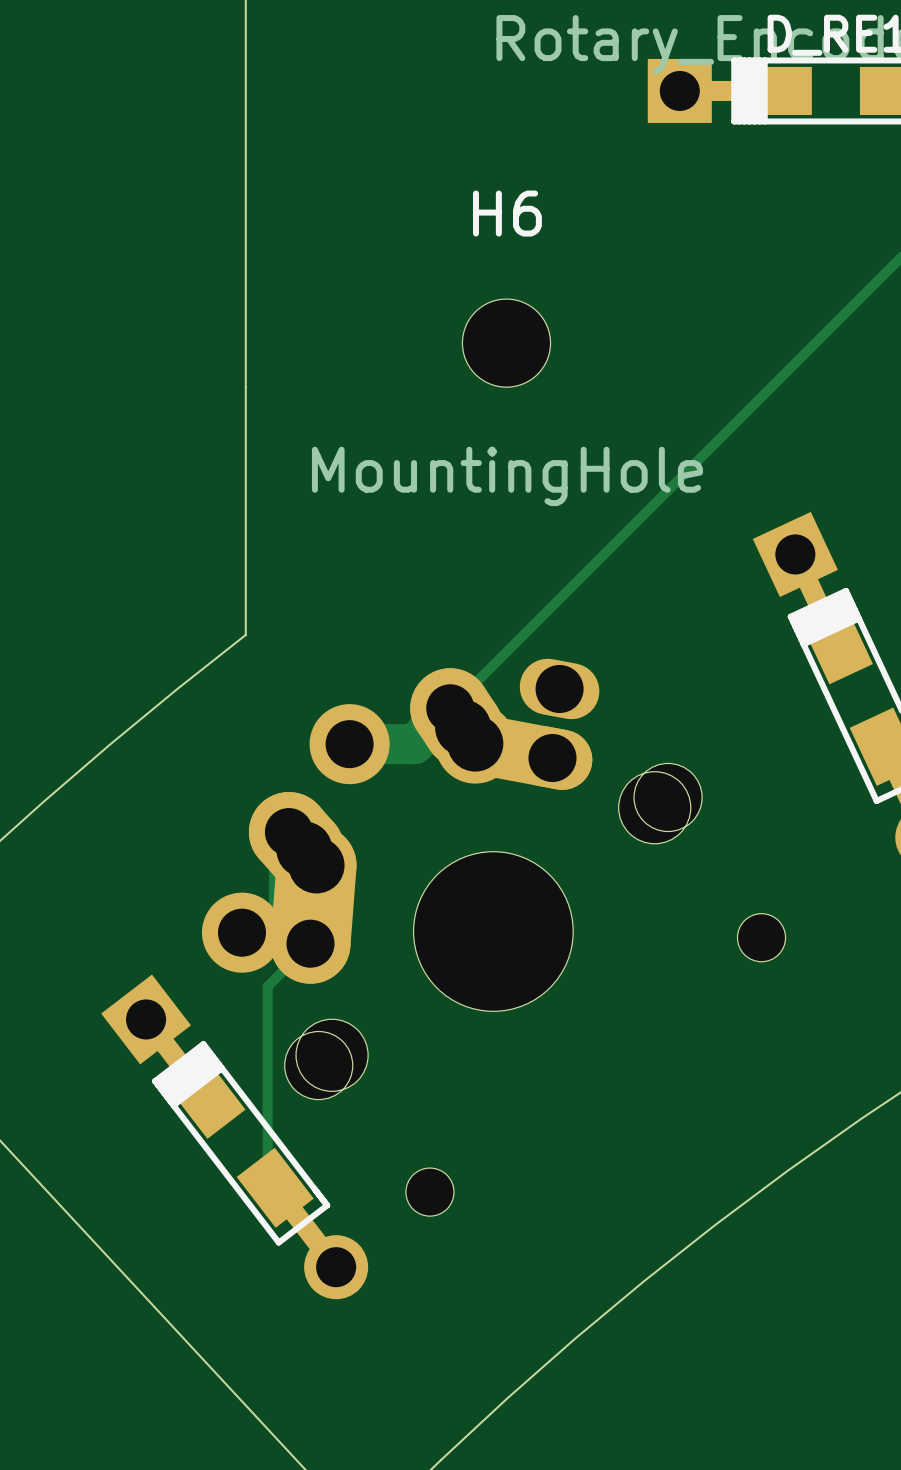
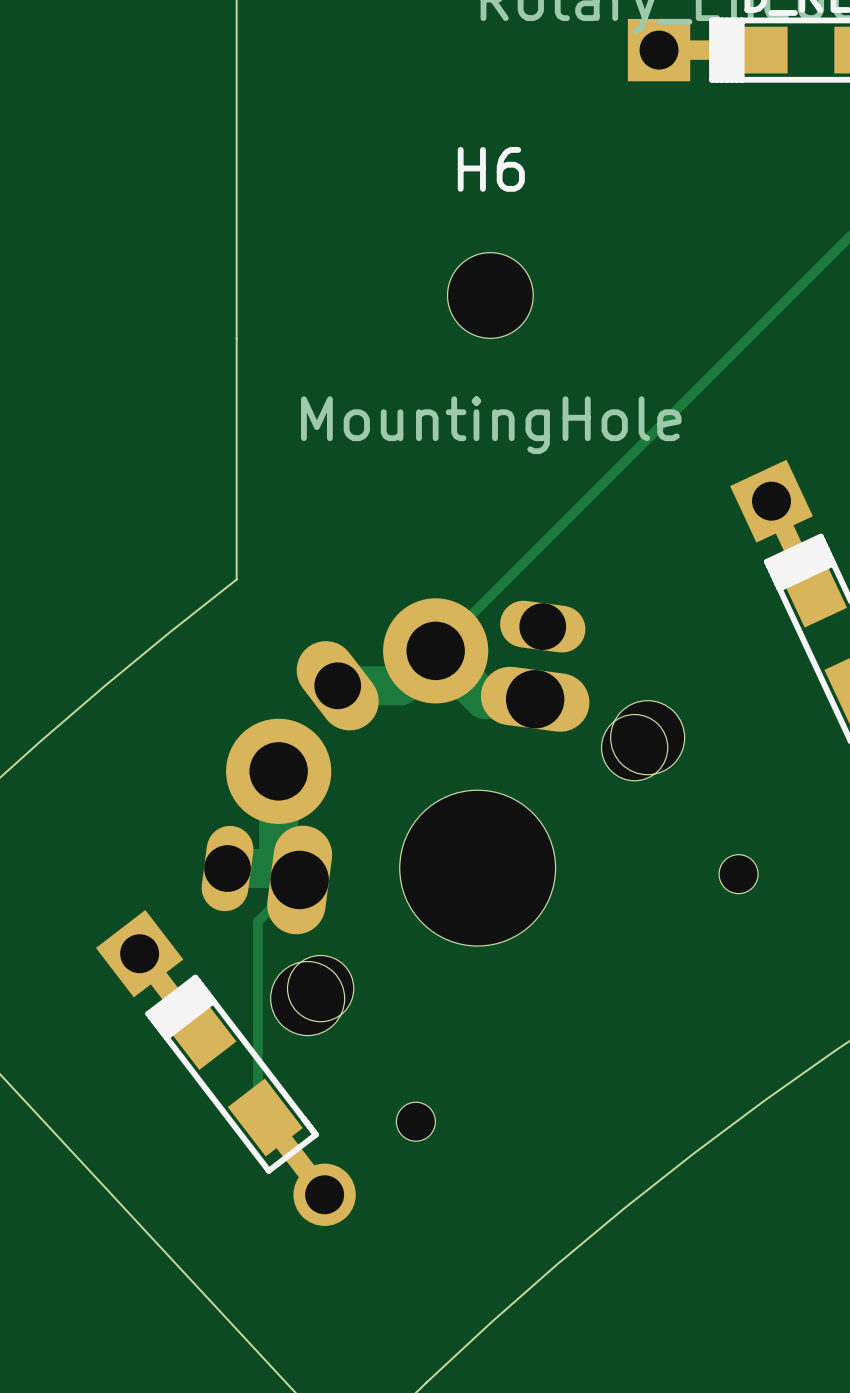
part footprint: [201, 658, 786, 1217] -> [201, 598, 759, 1142]

